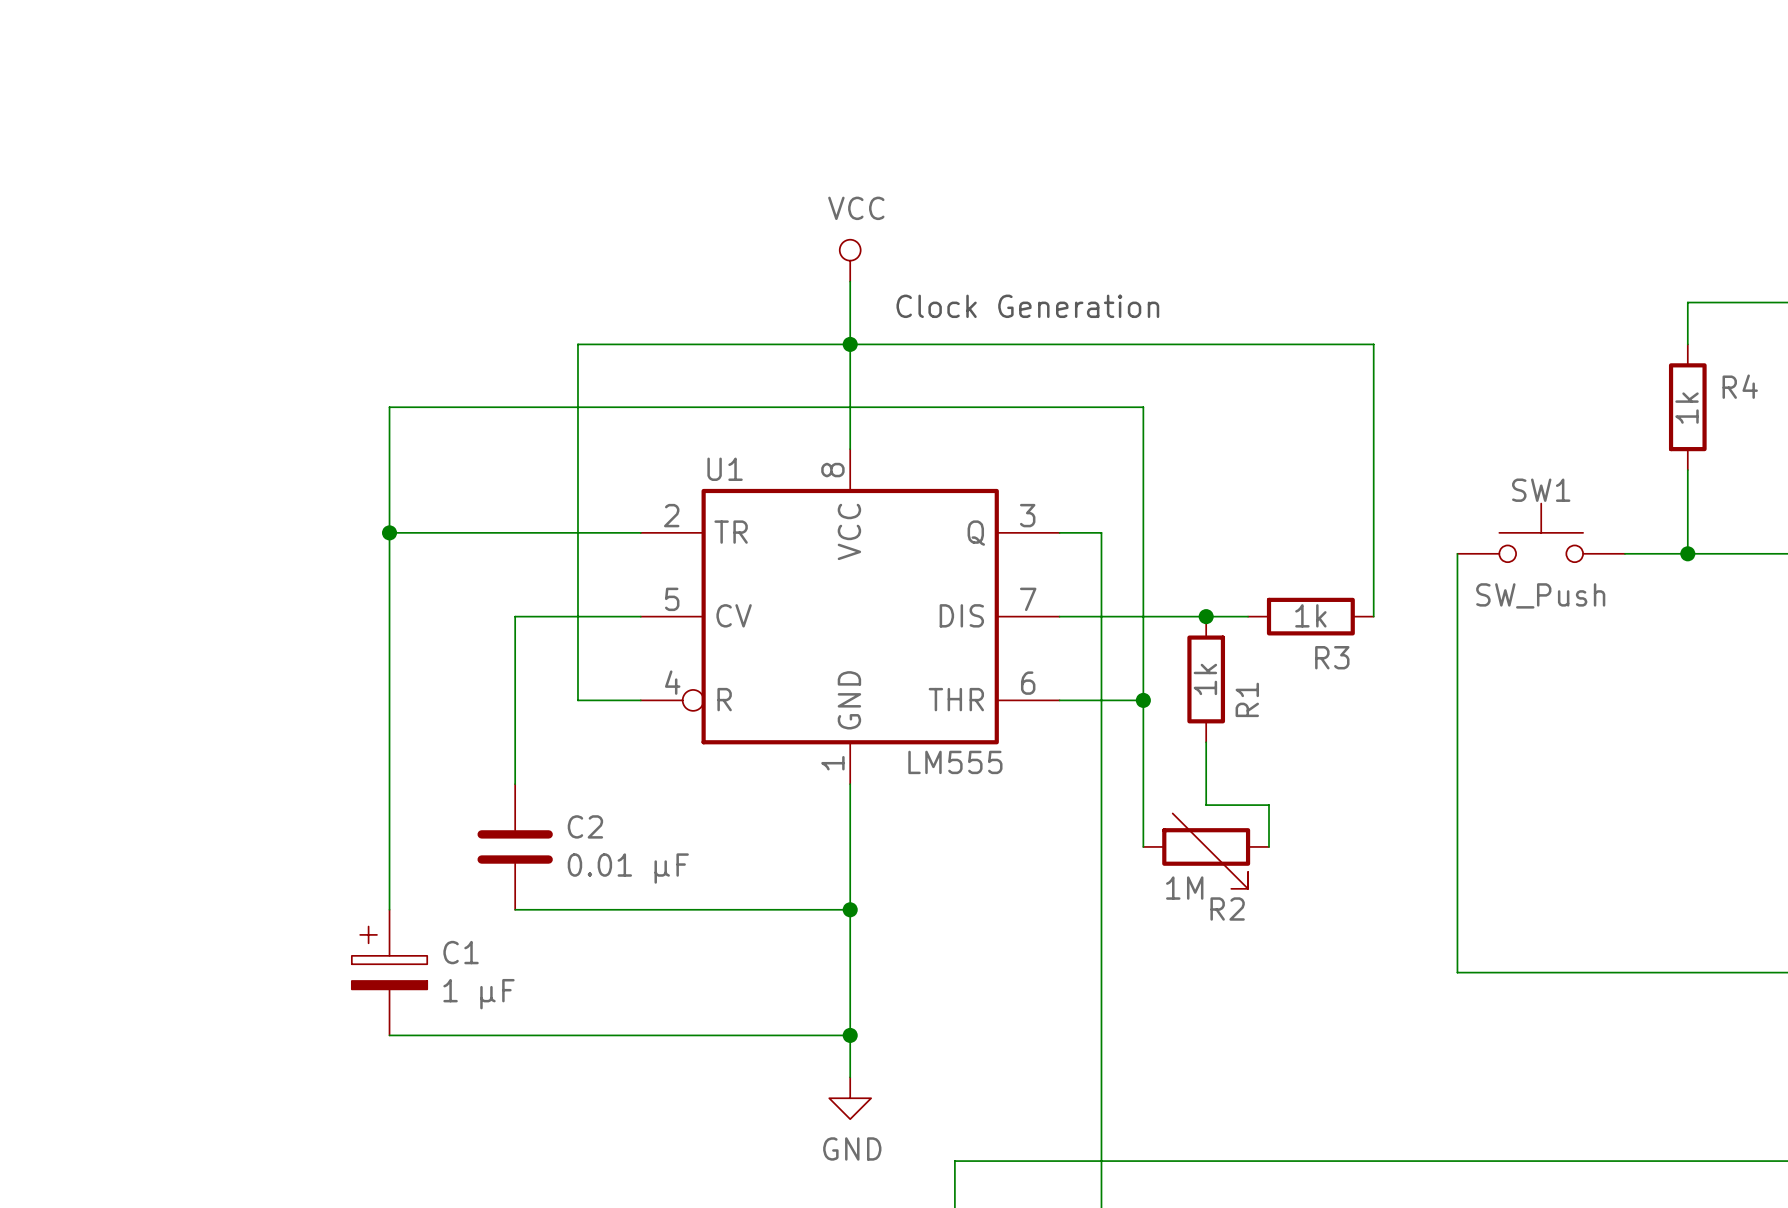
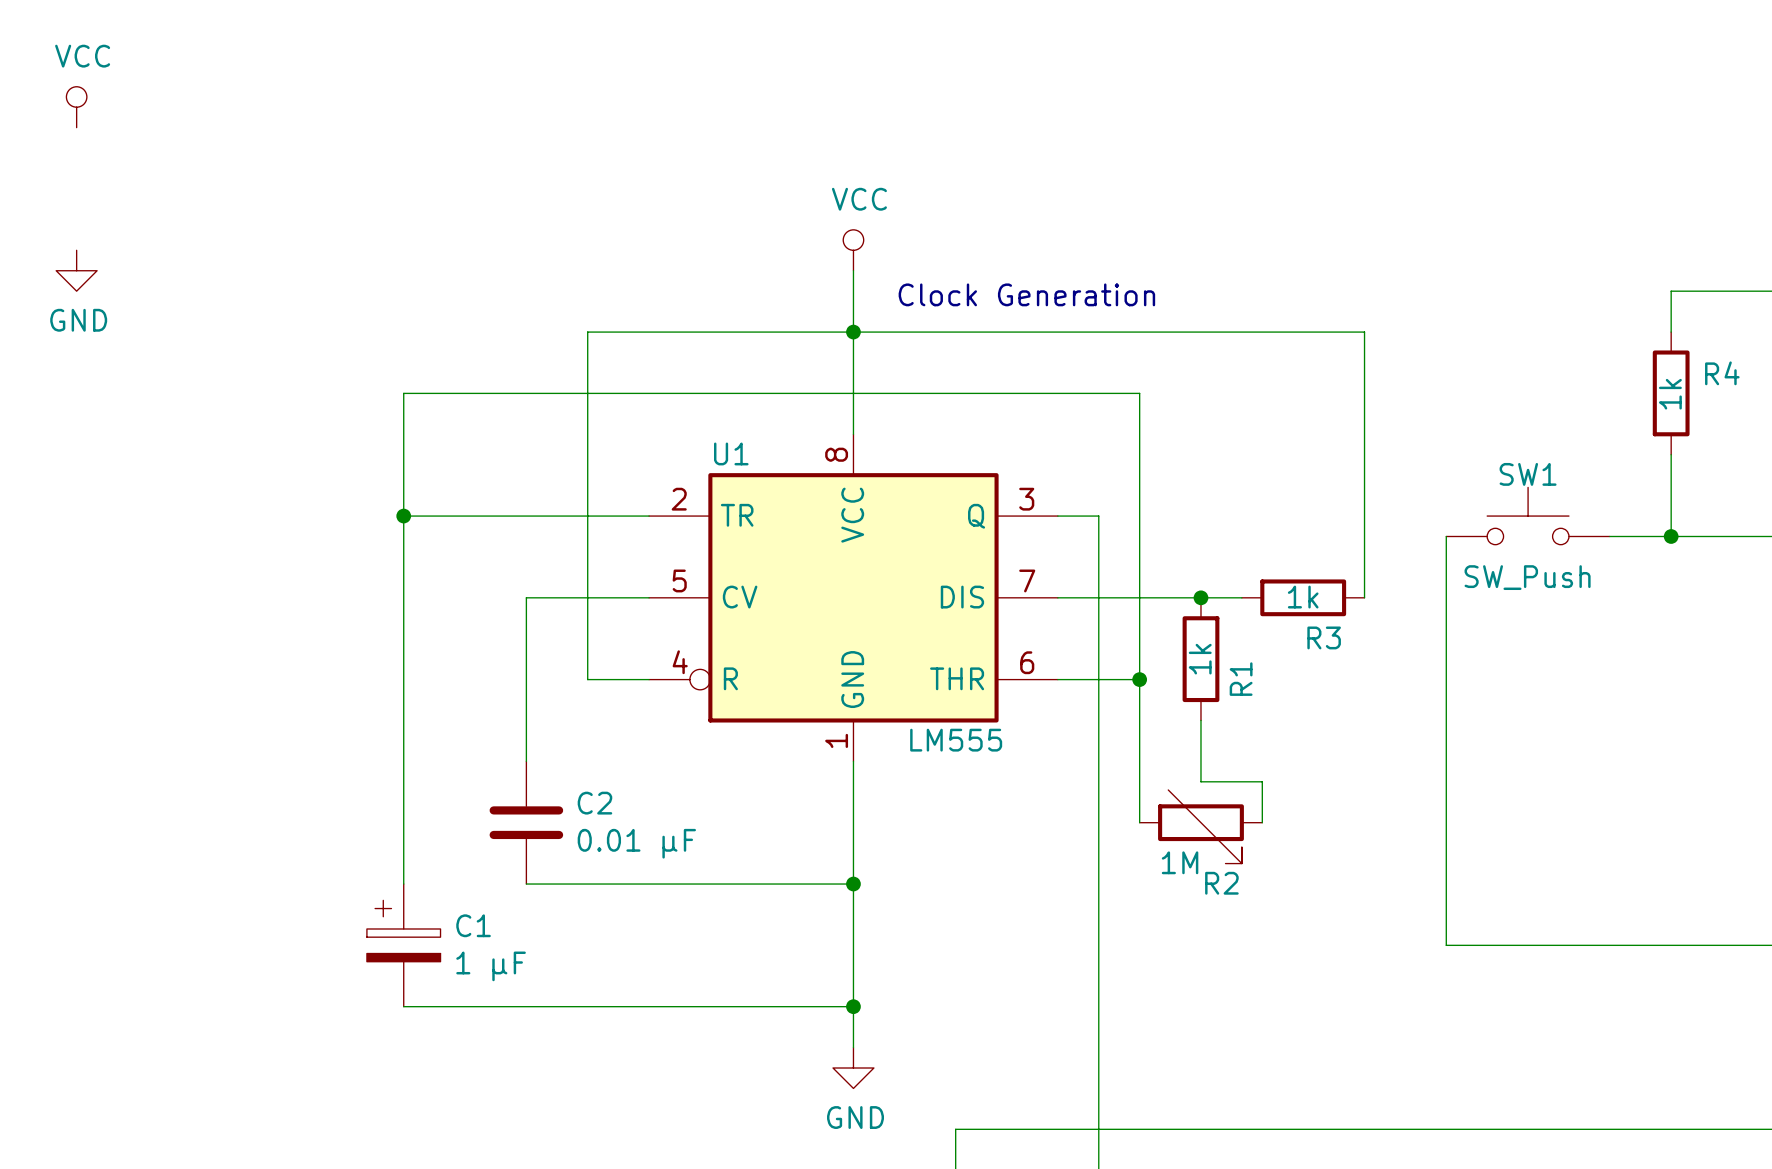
power symbol: none -> VCC (76, 107)
power symbol: none -> GND (76, 270)

